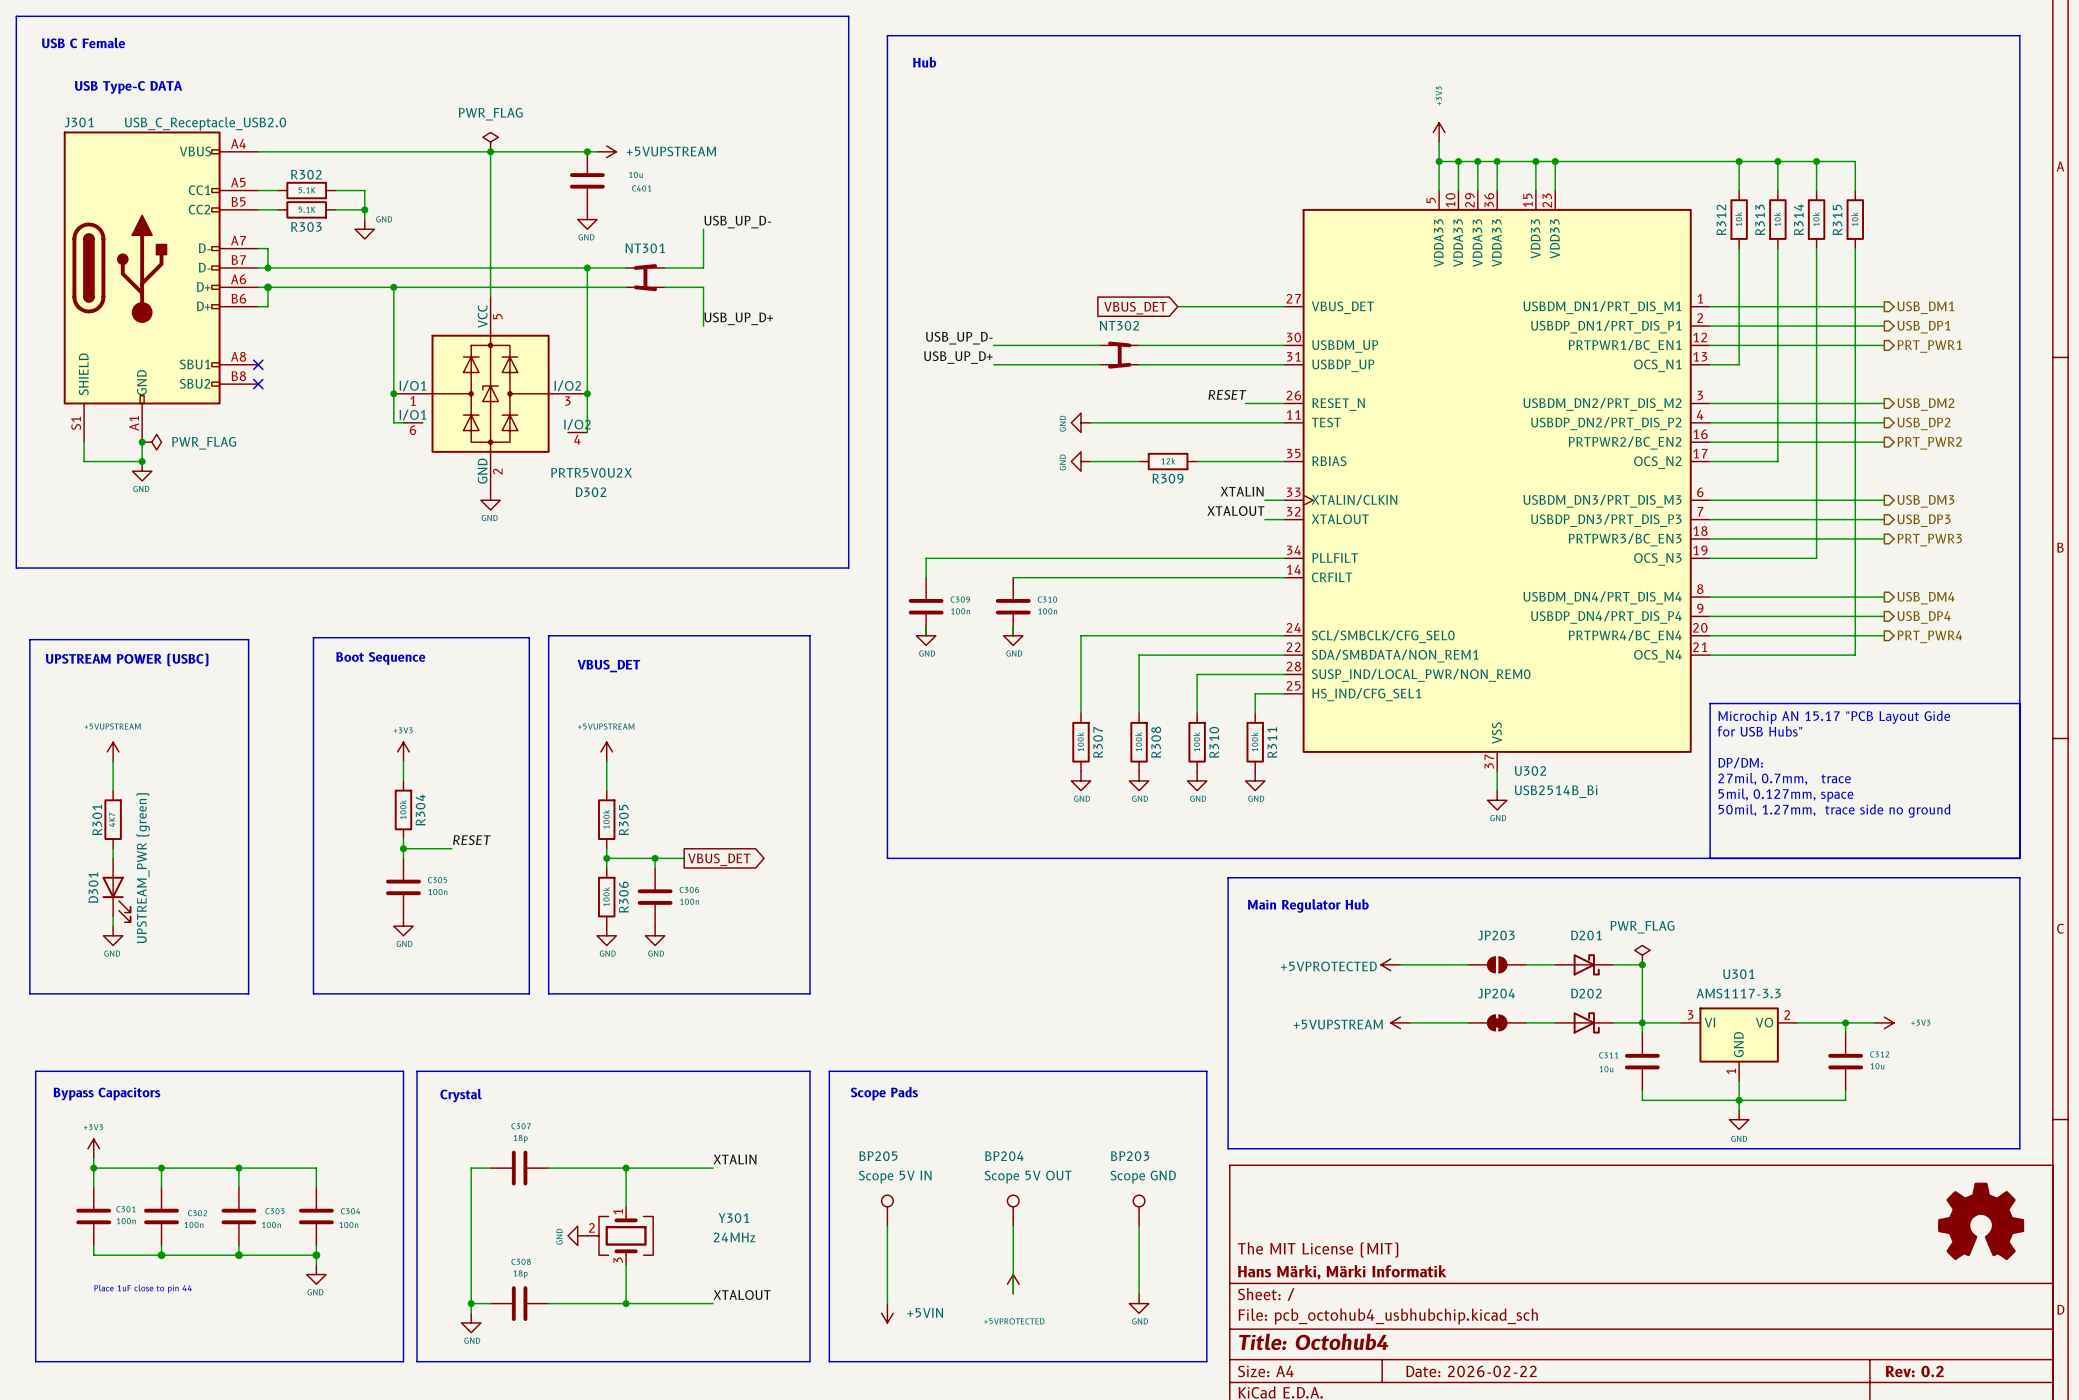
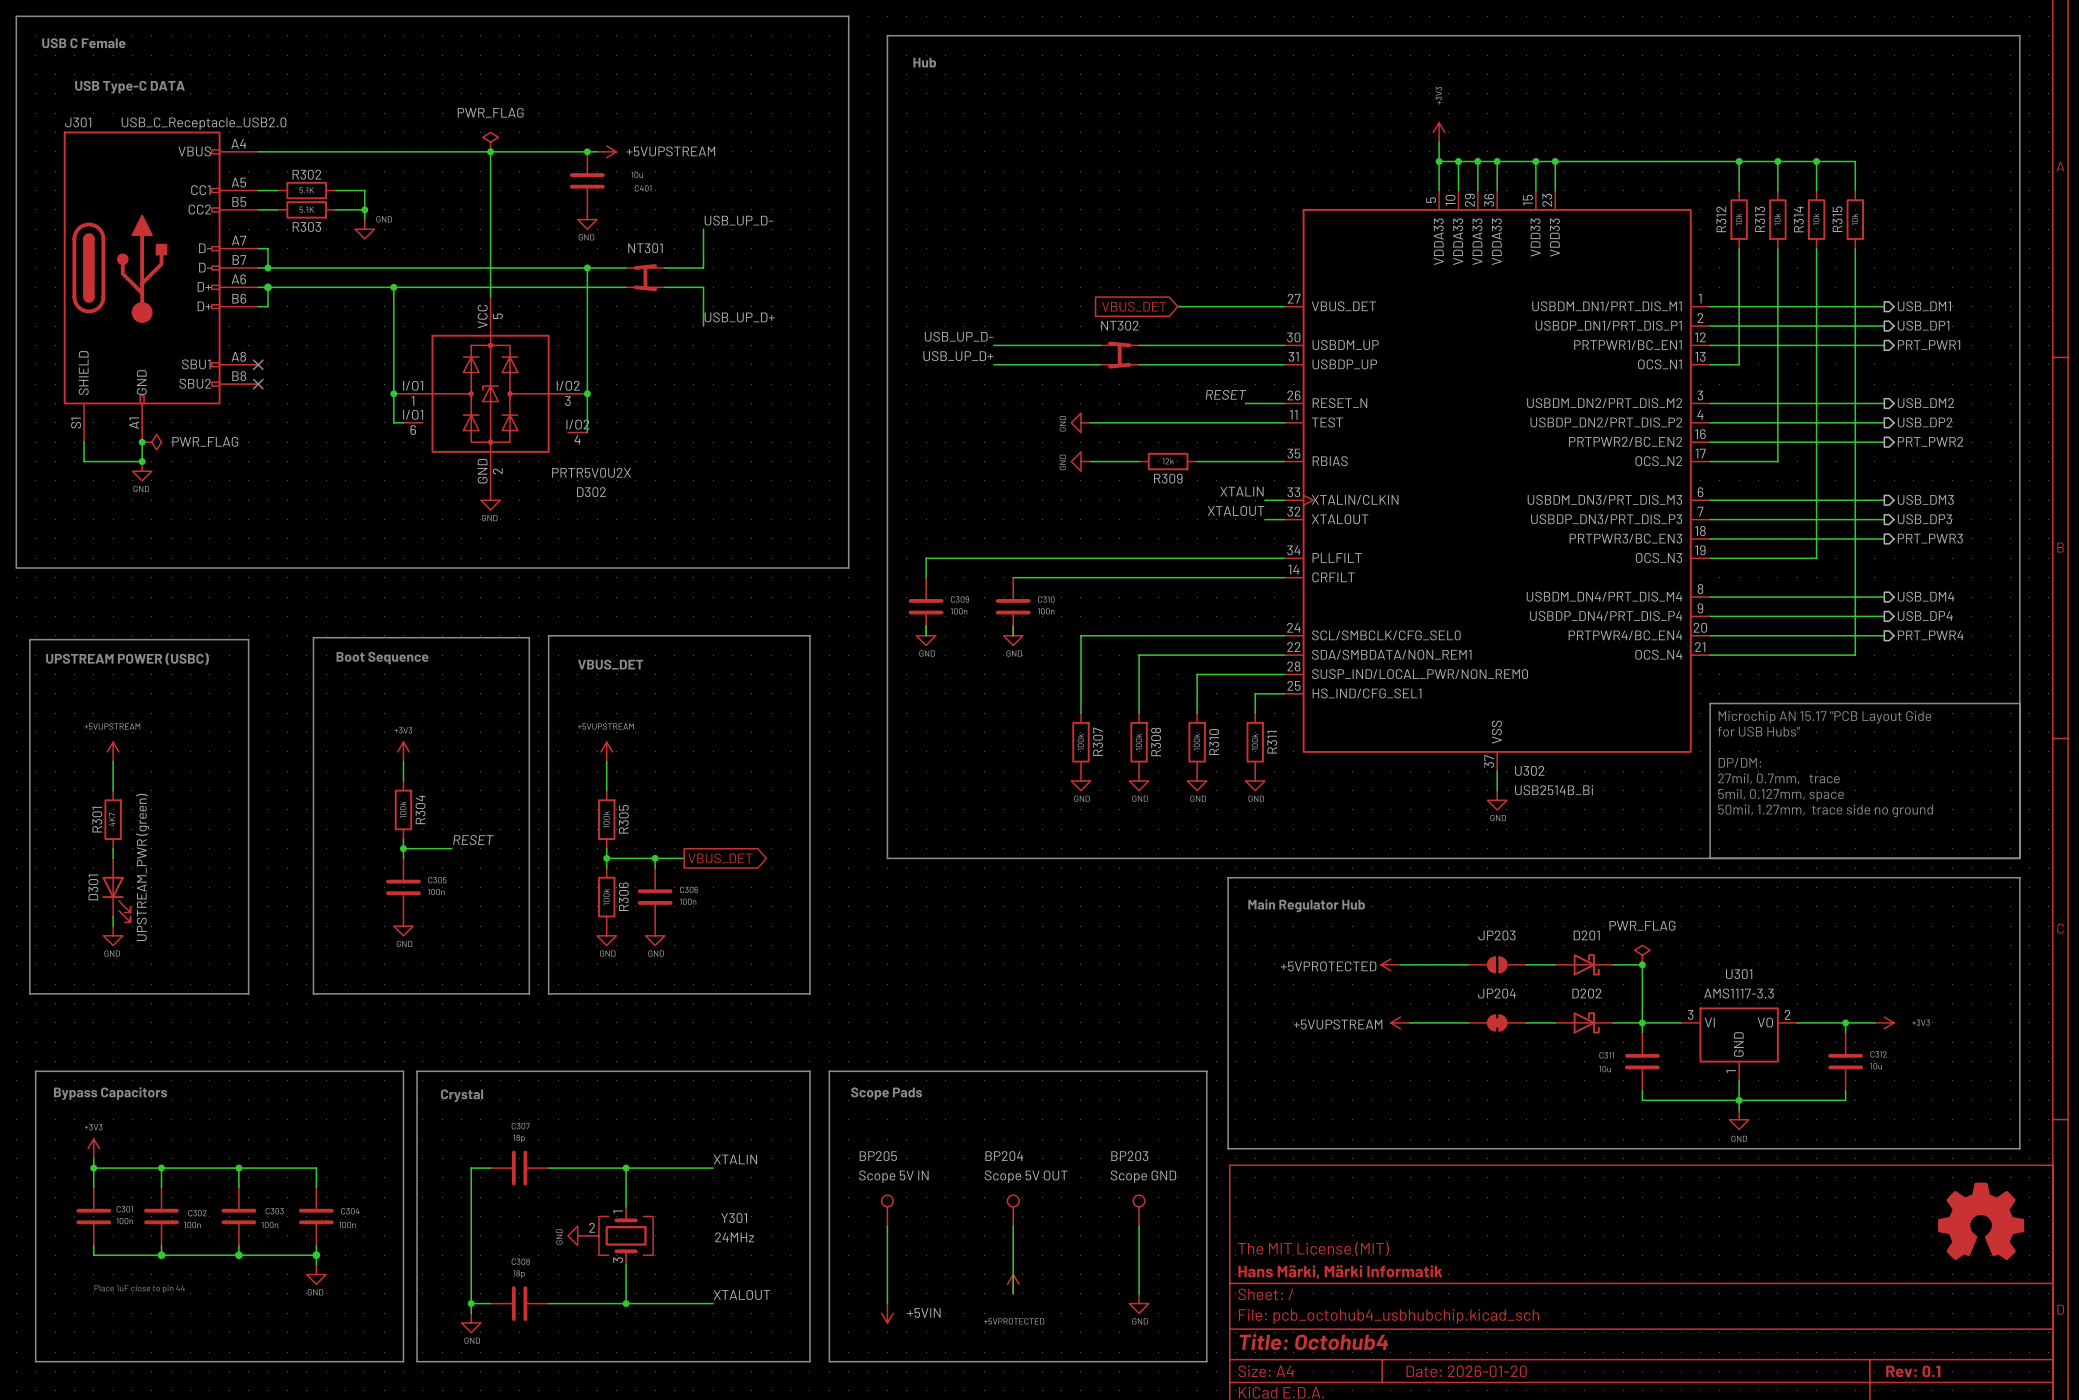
title block: Date: 2026-02-22 (1471, 1371) -> Date: 2026-01-20 (1466, 1371)
title block: Rev: 0.2 (1914, 1371) -> Rev: 0.1 (1913, 1371)

